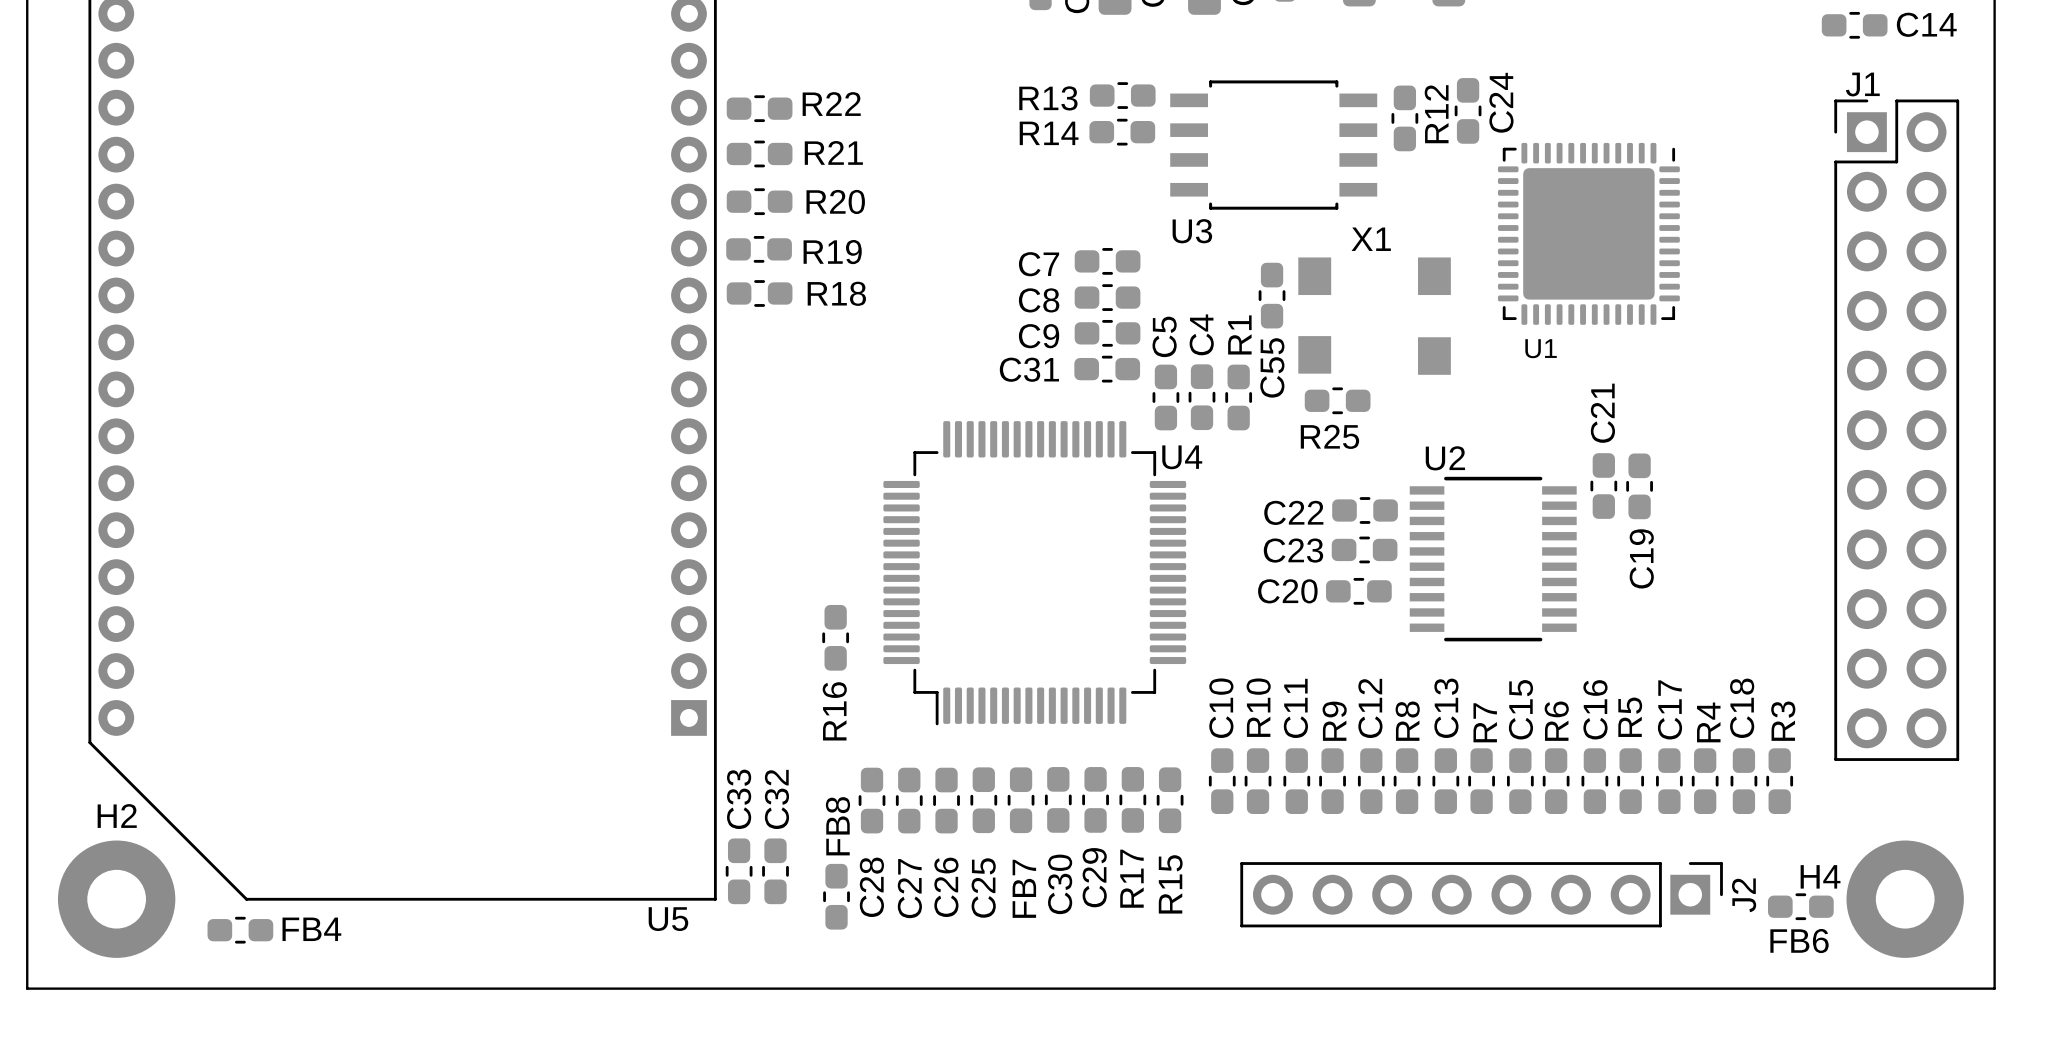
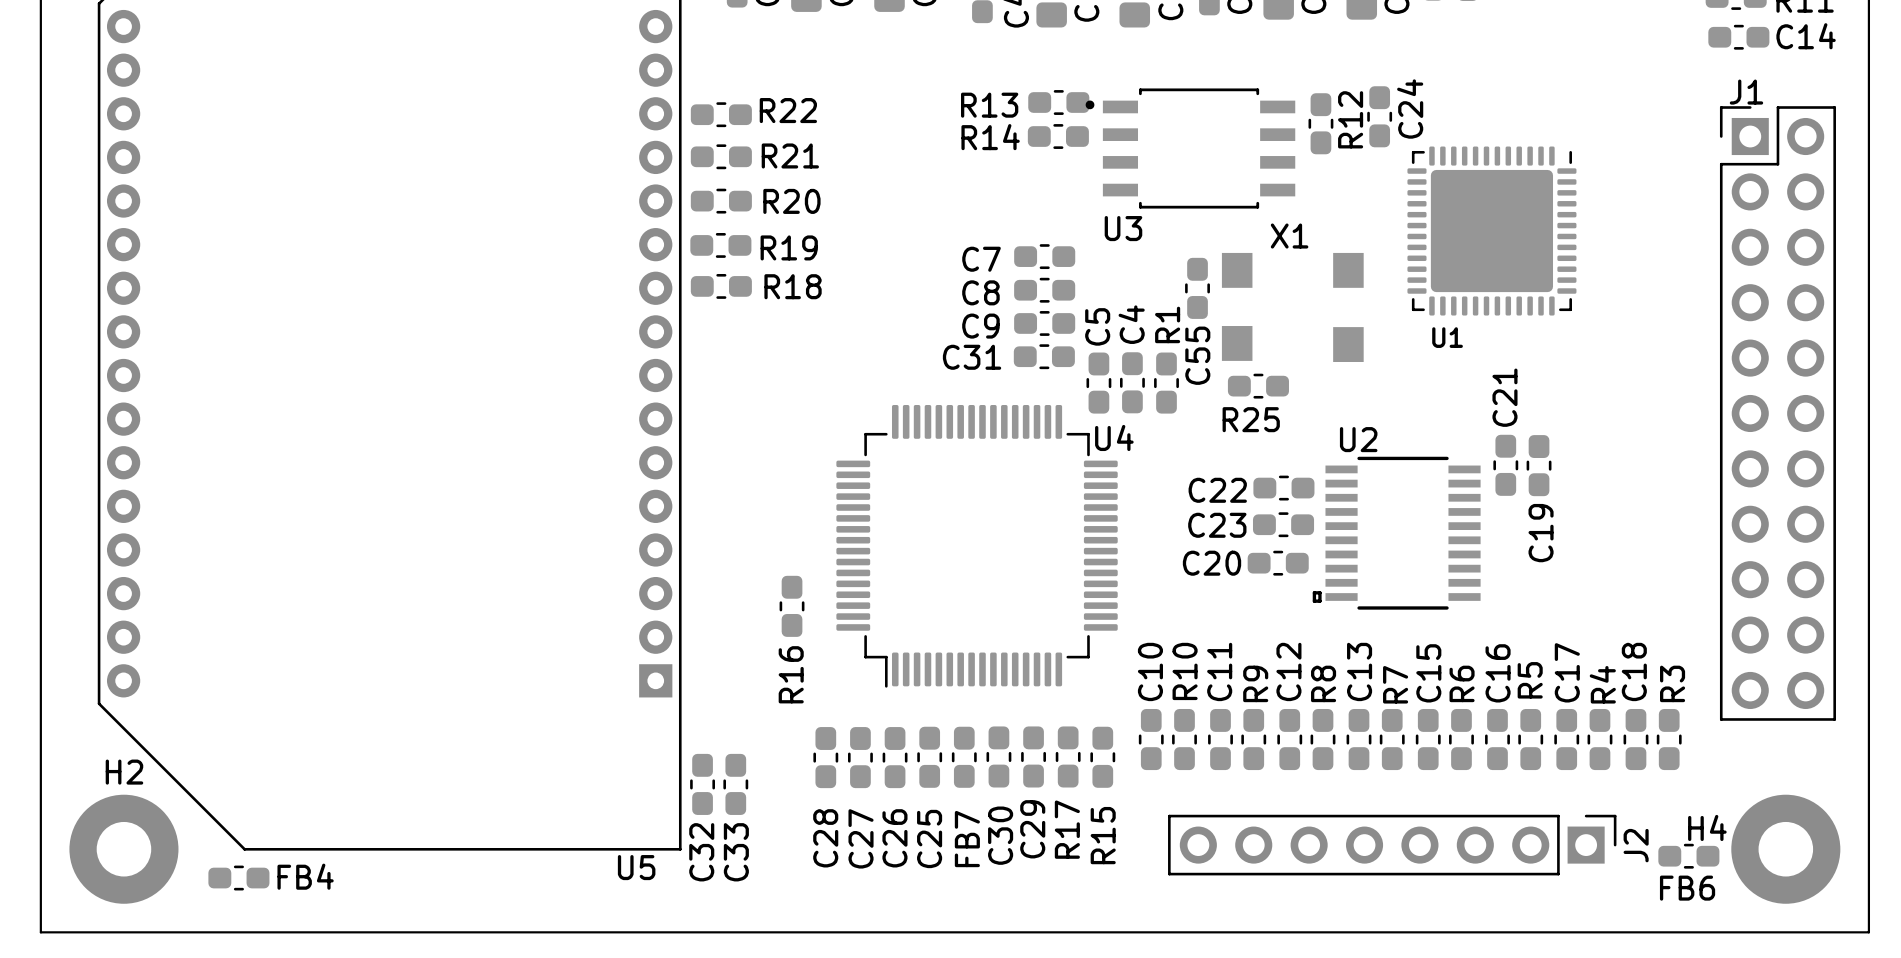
U3 footprint: [1170, 80, 1378, 210] -> [1085, 88, 1296, 209]
U2 footprint: [1409, 476, 1577, 642] -> [1312, 456, 1481, 610]
C33 name position: C33 (739, 799) -> C33 (736, 852)
C32 name position: C32 (776, 799) -> C32 (701, 852)
C33 position: (739, 871) -> (735, 784)
C32 position: (775, 871) -> (702, 784)
FB8: (836, 896) -> none

